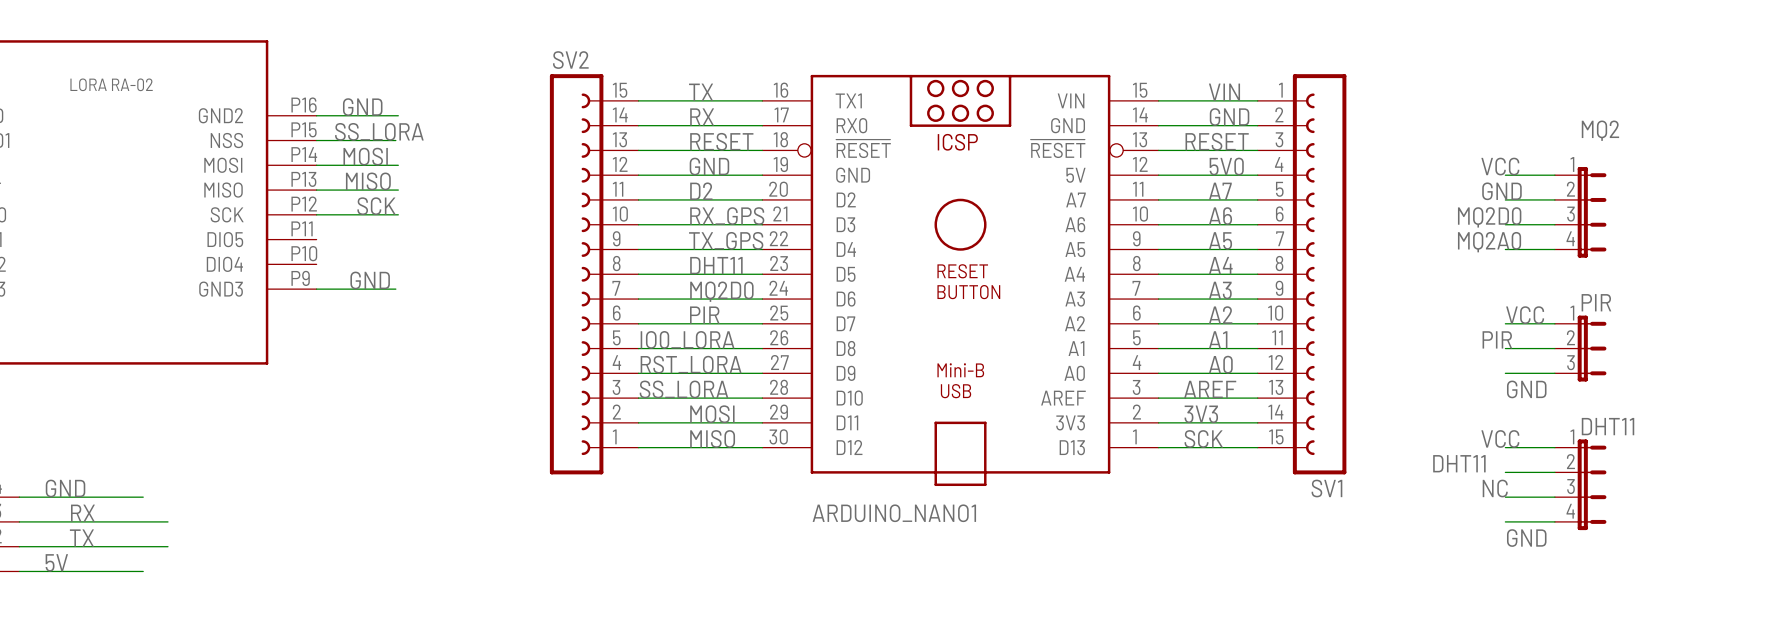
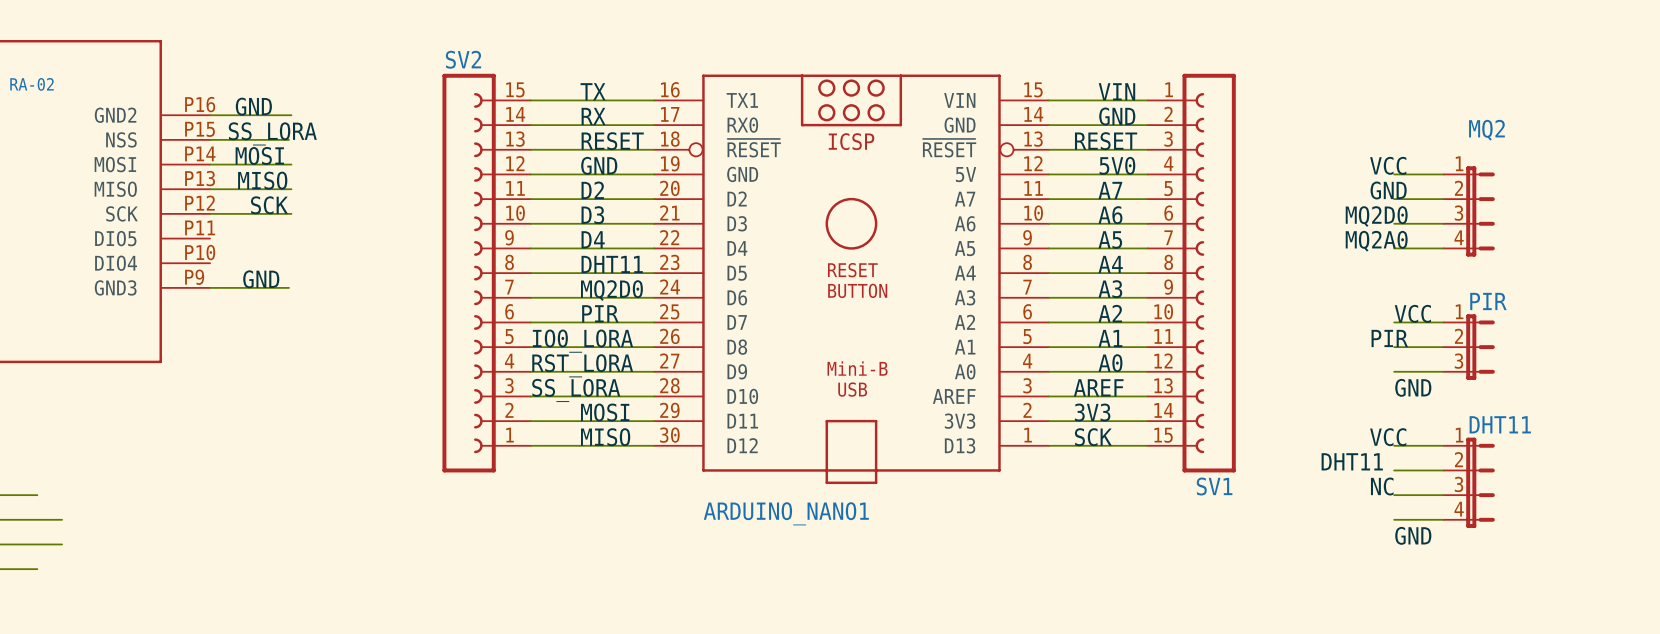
label: RX_GPS (727, 216) -> D3 (592, 215)
label: TX_GPS (726, 240) -> D4 (593, 239)

